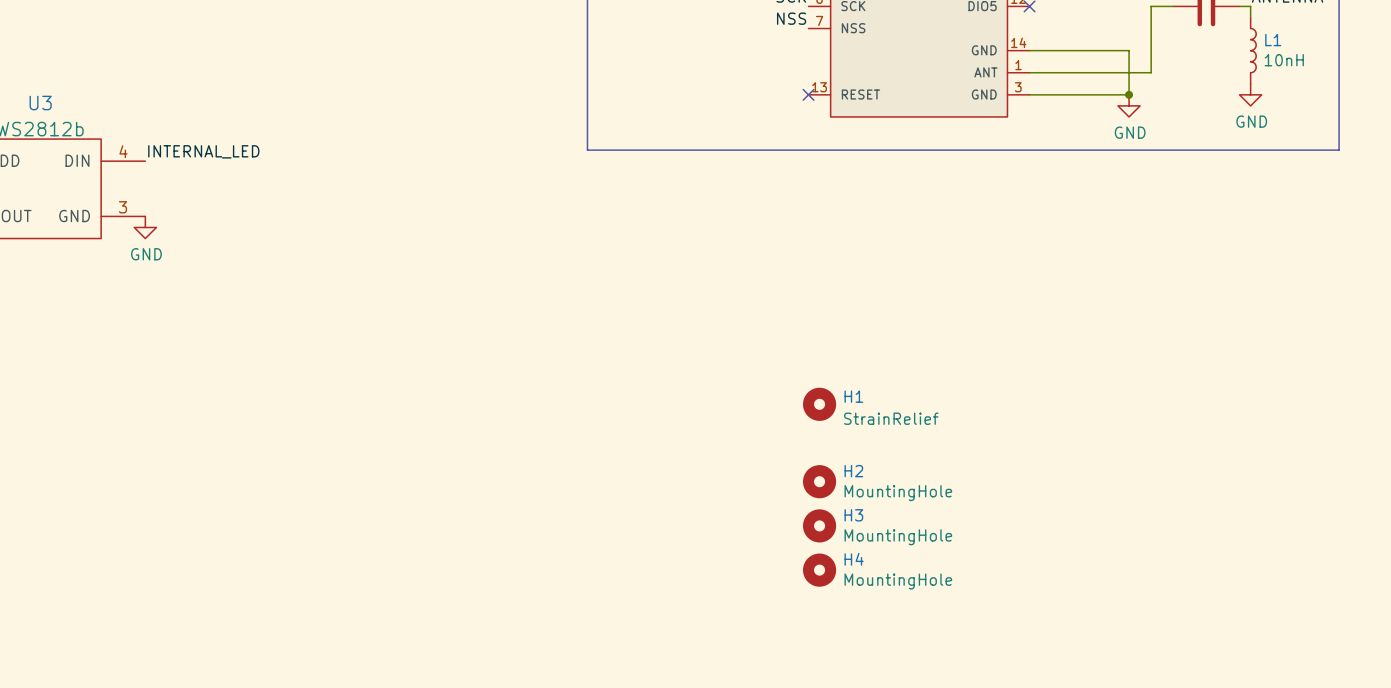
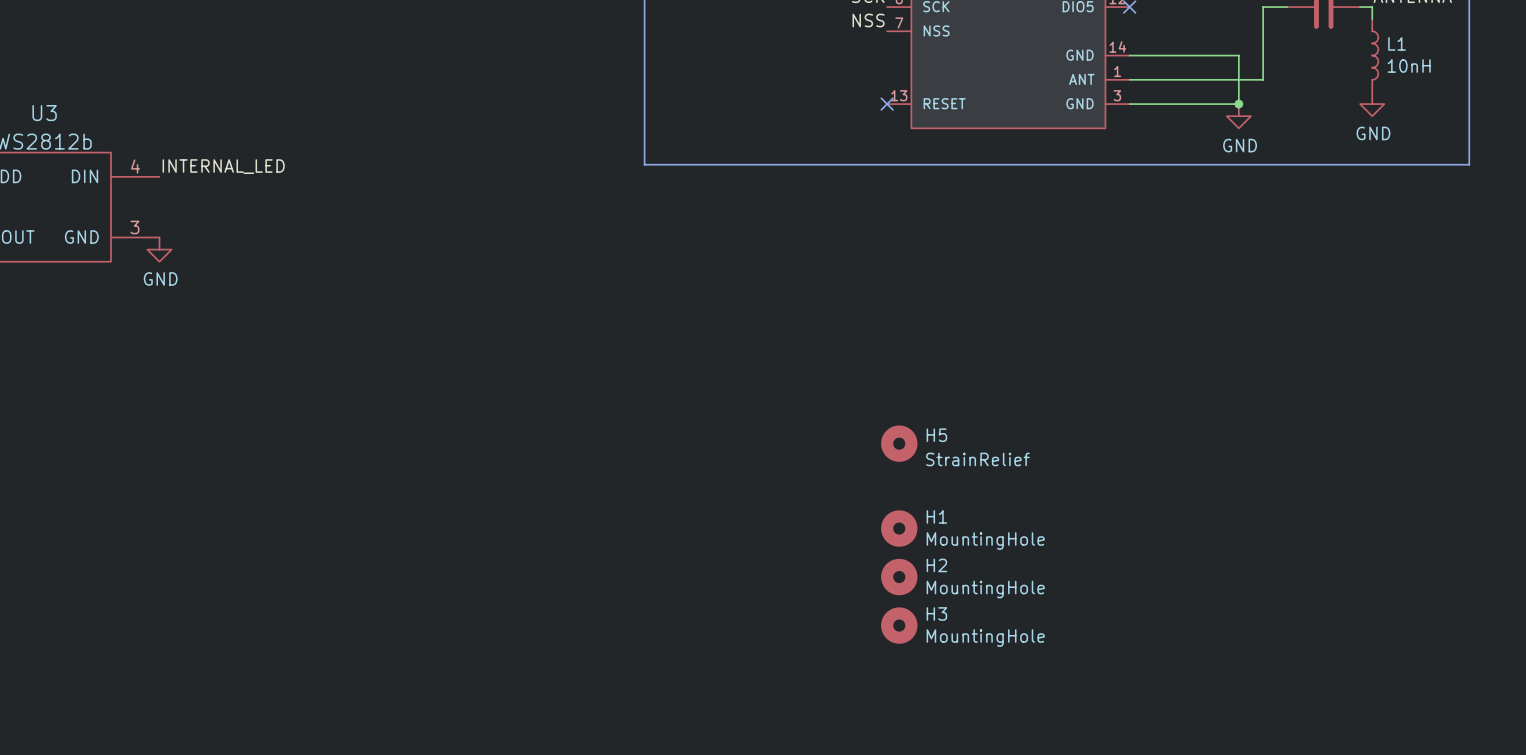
H1 name: H1 (853, 396) -> H5 (936, 435)
H2 name: H2 (853, 471) -> H1 (936, 516)
H3 name: H3 (853, 515) -> H2 (936, 565)
H4 name: H4 (854, 559) -> H3 (936, 613)

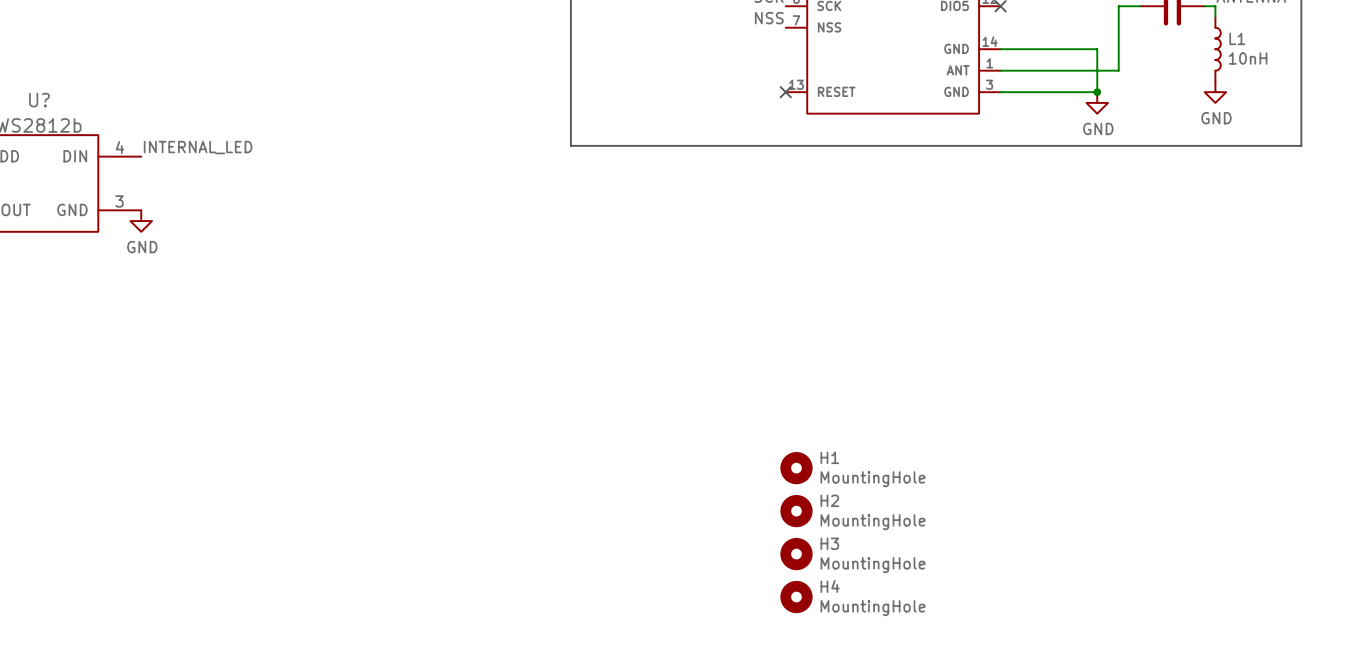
U3 name: U3 (44, 113) -> U? (39, 100)
H5: StrainRelief (899, 443) -> none
H4: none -> MountingHole (796, 597)

